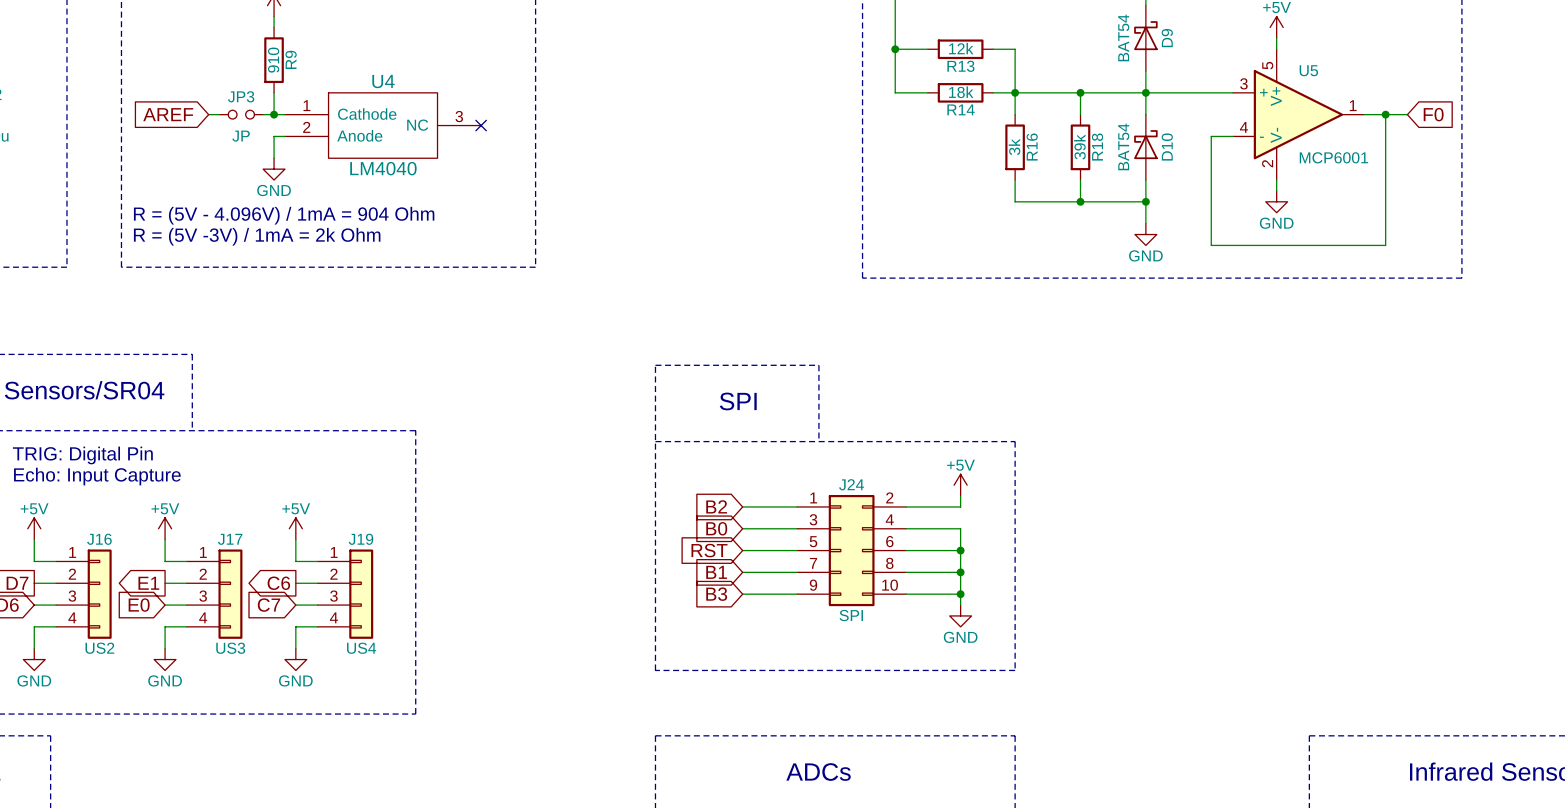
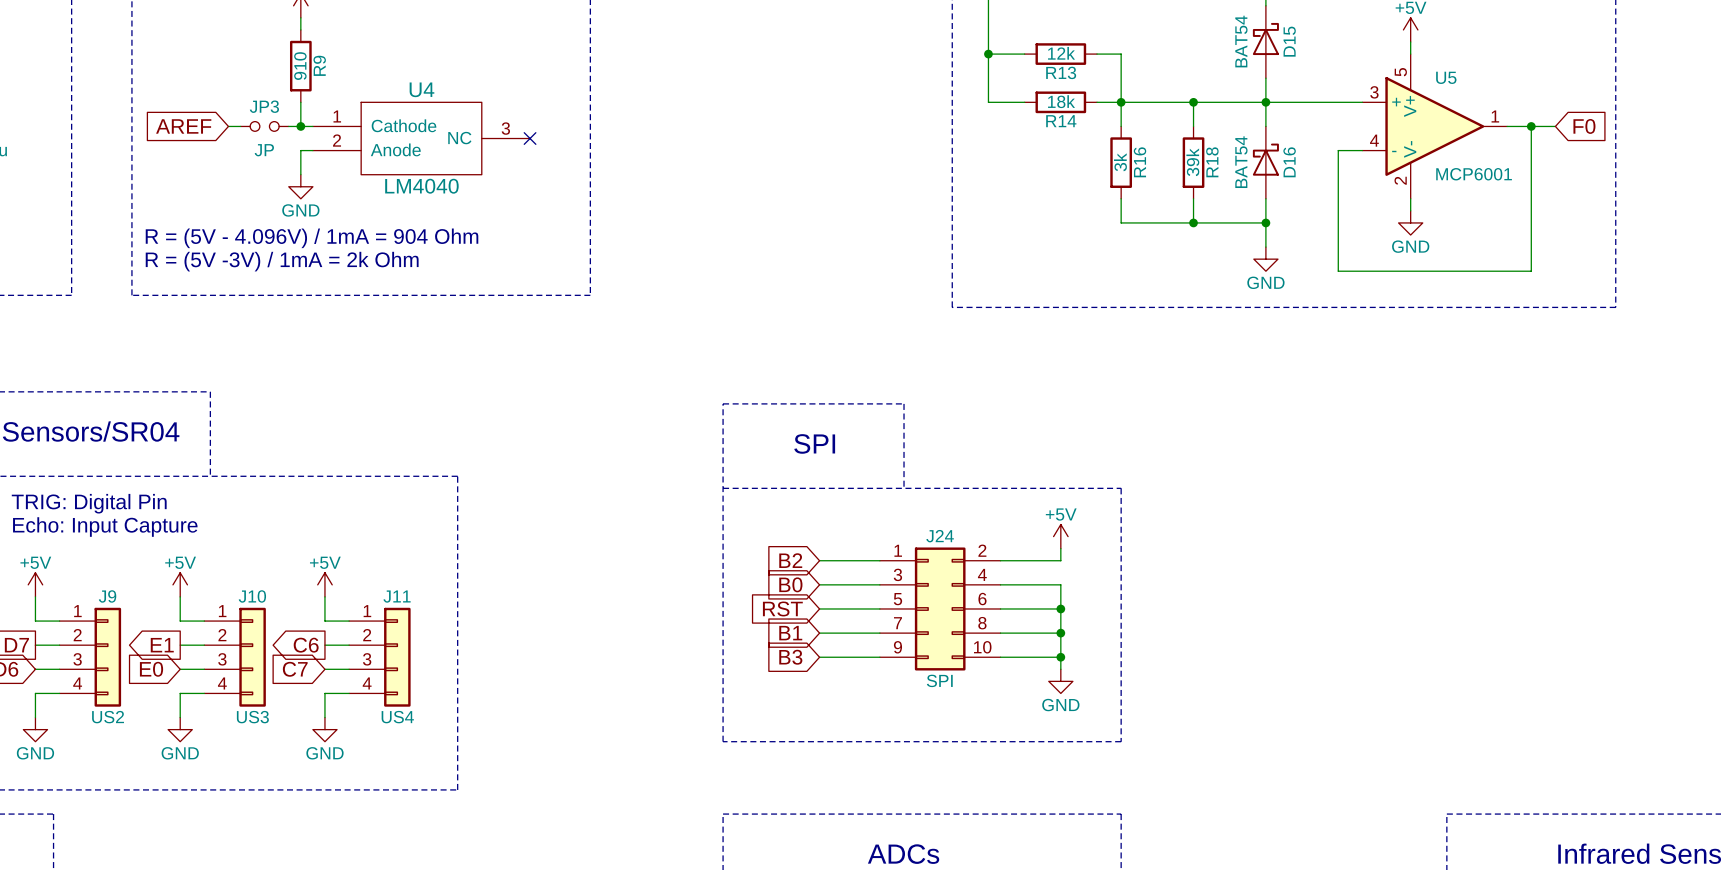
D9 name: D9 (1167, 38) -> D15 (1289, 41)
D10 name: D10 (1167, 147) -> D16 (1289, 162)
J16 name: J16 (99, 539) -> J9 (107, 596)
J17 name: J17 (230, 539) -> J10 (252, 596)
J19 name: J19 (360, 539) -> J11 (397, 596)

